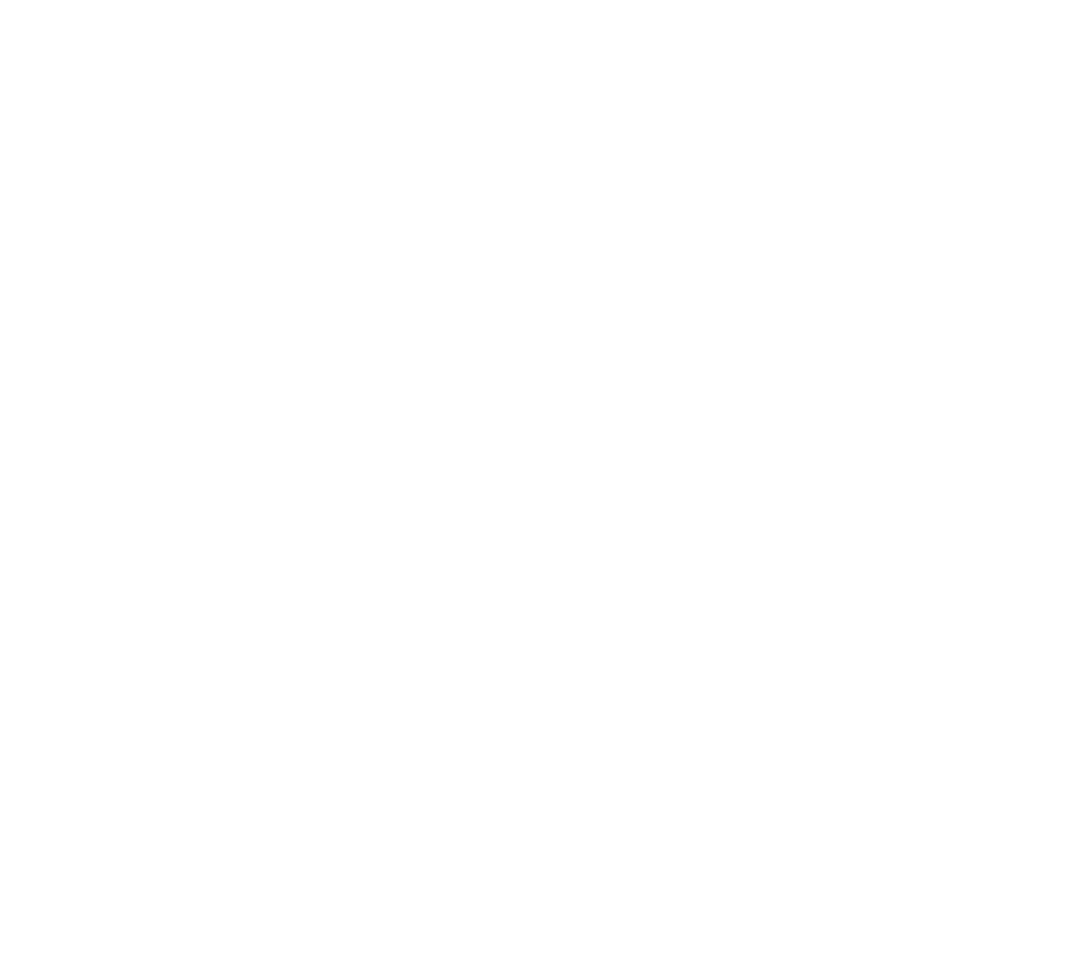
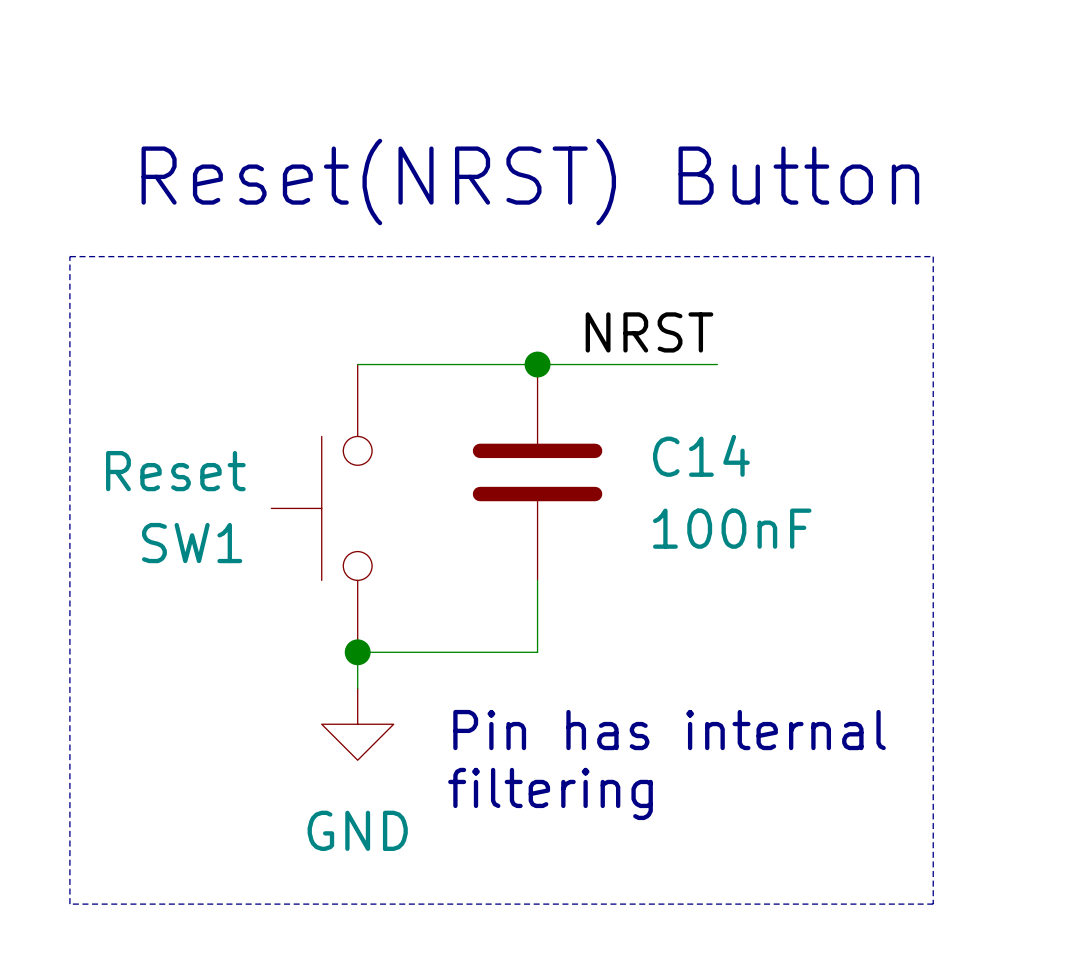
text: none -> Reset(NRST) Button (530, 182)
line: none -> (69, 256) (933, 256) (933, 904) (69, 904) (69, 256)
label: none -> NRST (649, 332)
wire: none -> (357, 364) (717, 364)
junction: none -> (537, 364)
C14: none -> 100nF (537, 472)
SW1: none -> Reset (321, 508)
wire: none -> (537, 580) (537, 652) (357, 652) (357, 688)
junction: none -> (357, 652)
power symbol: none -> GND (357, 724)
text: none -> Pin has internal (669, 730)
text: none -> filtering (550, 793)

